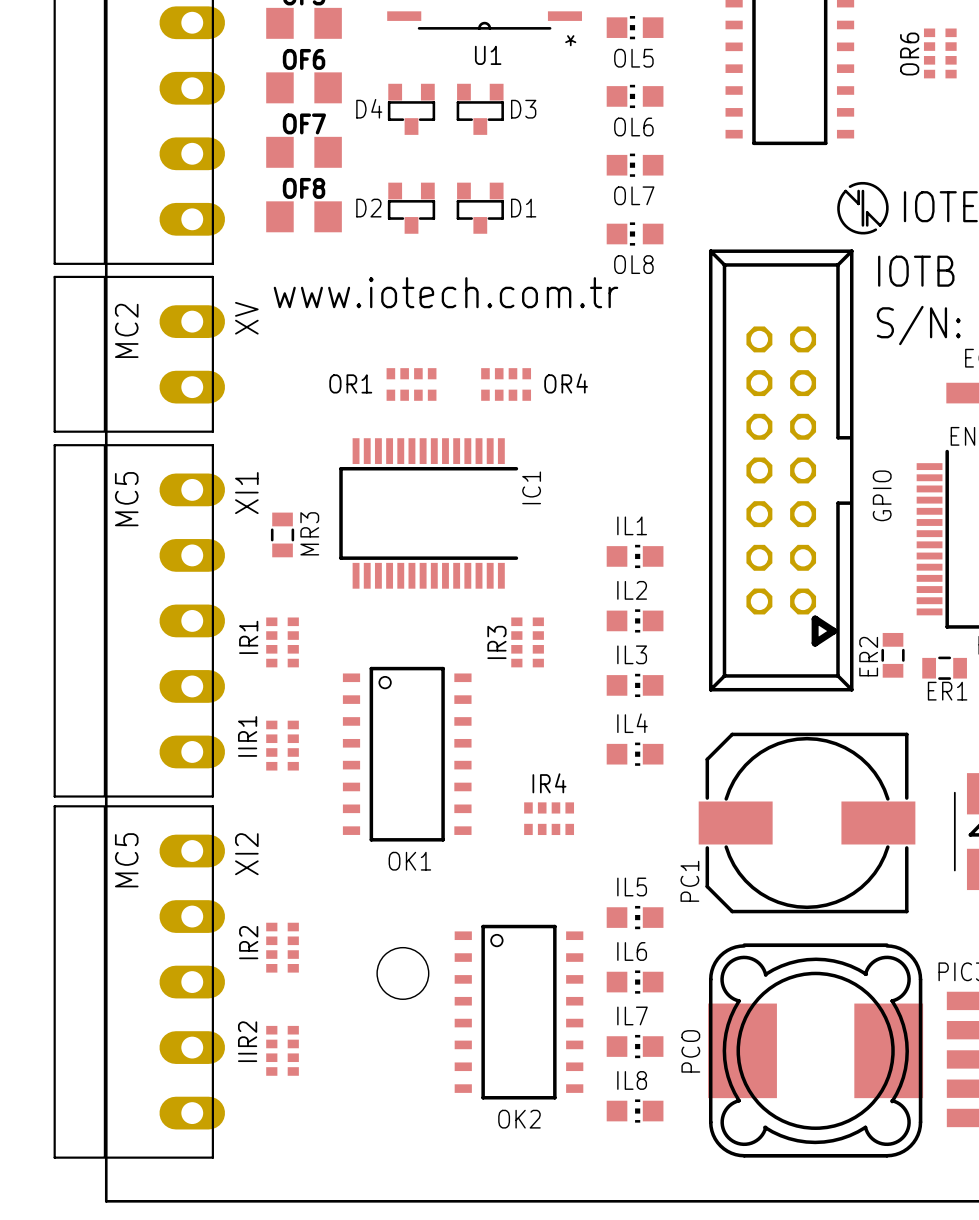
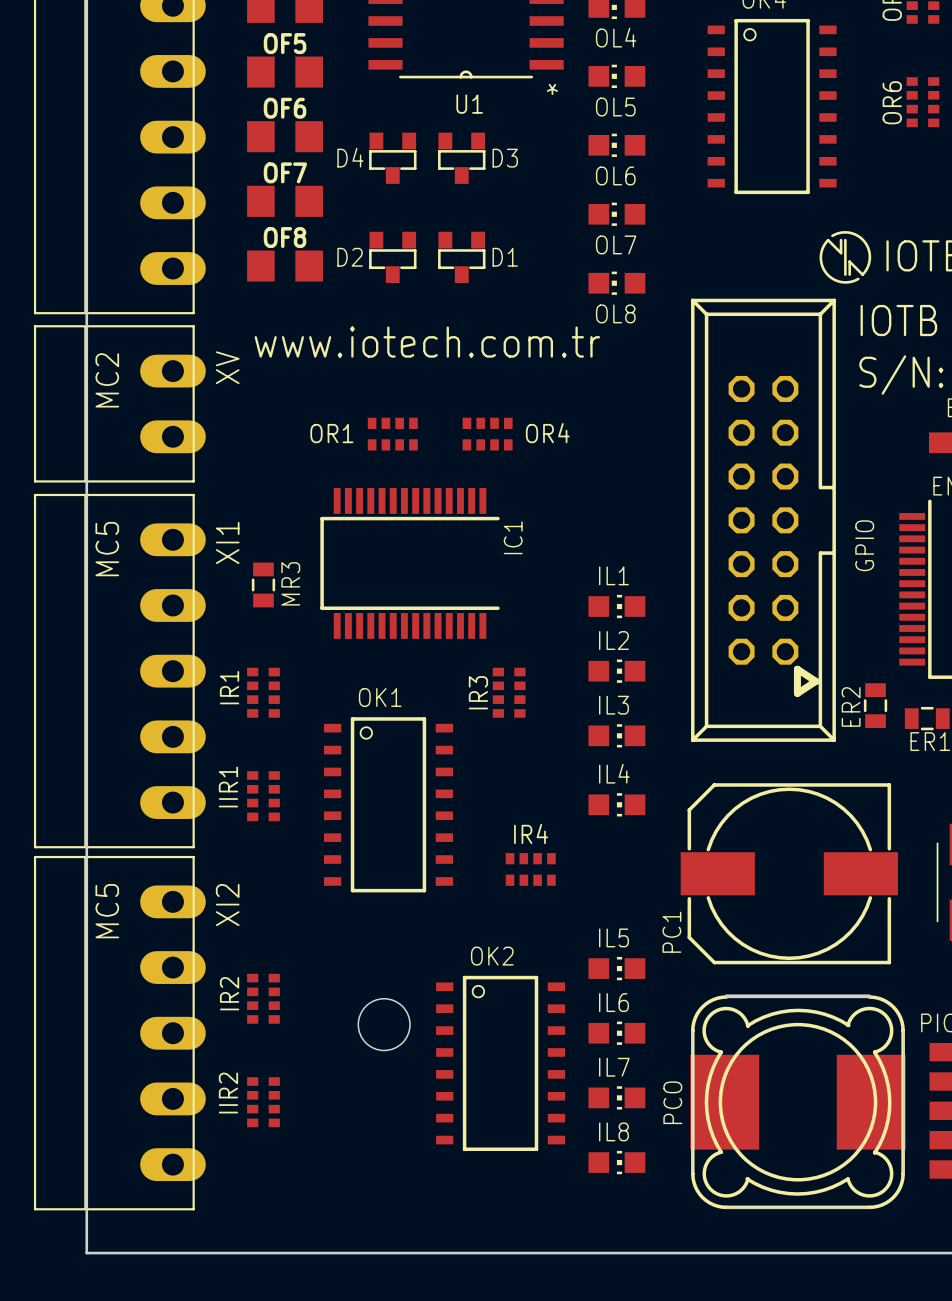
OK1 name position: OK1 (409, 861) -> OK1 (380, 697)
OK2 name position: OK2 (519, 1119) -> OK2 (492, 956)

